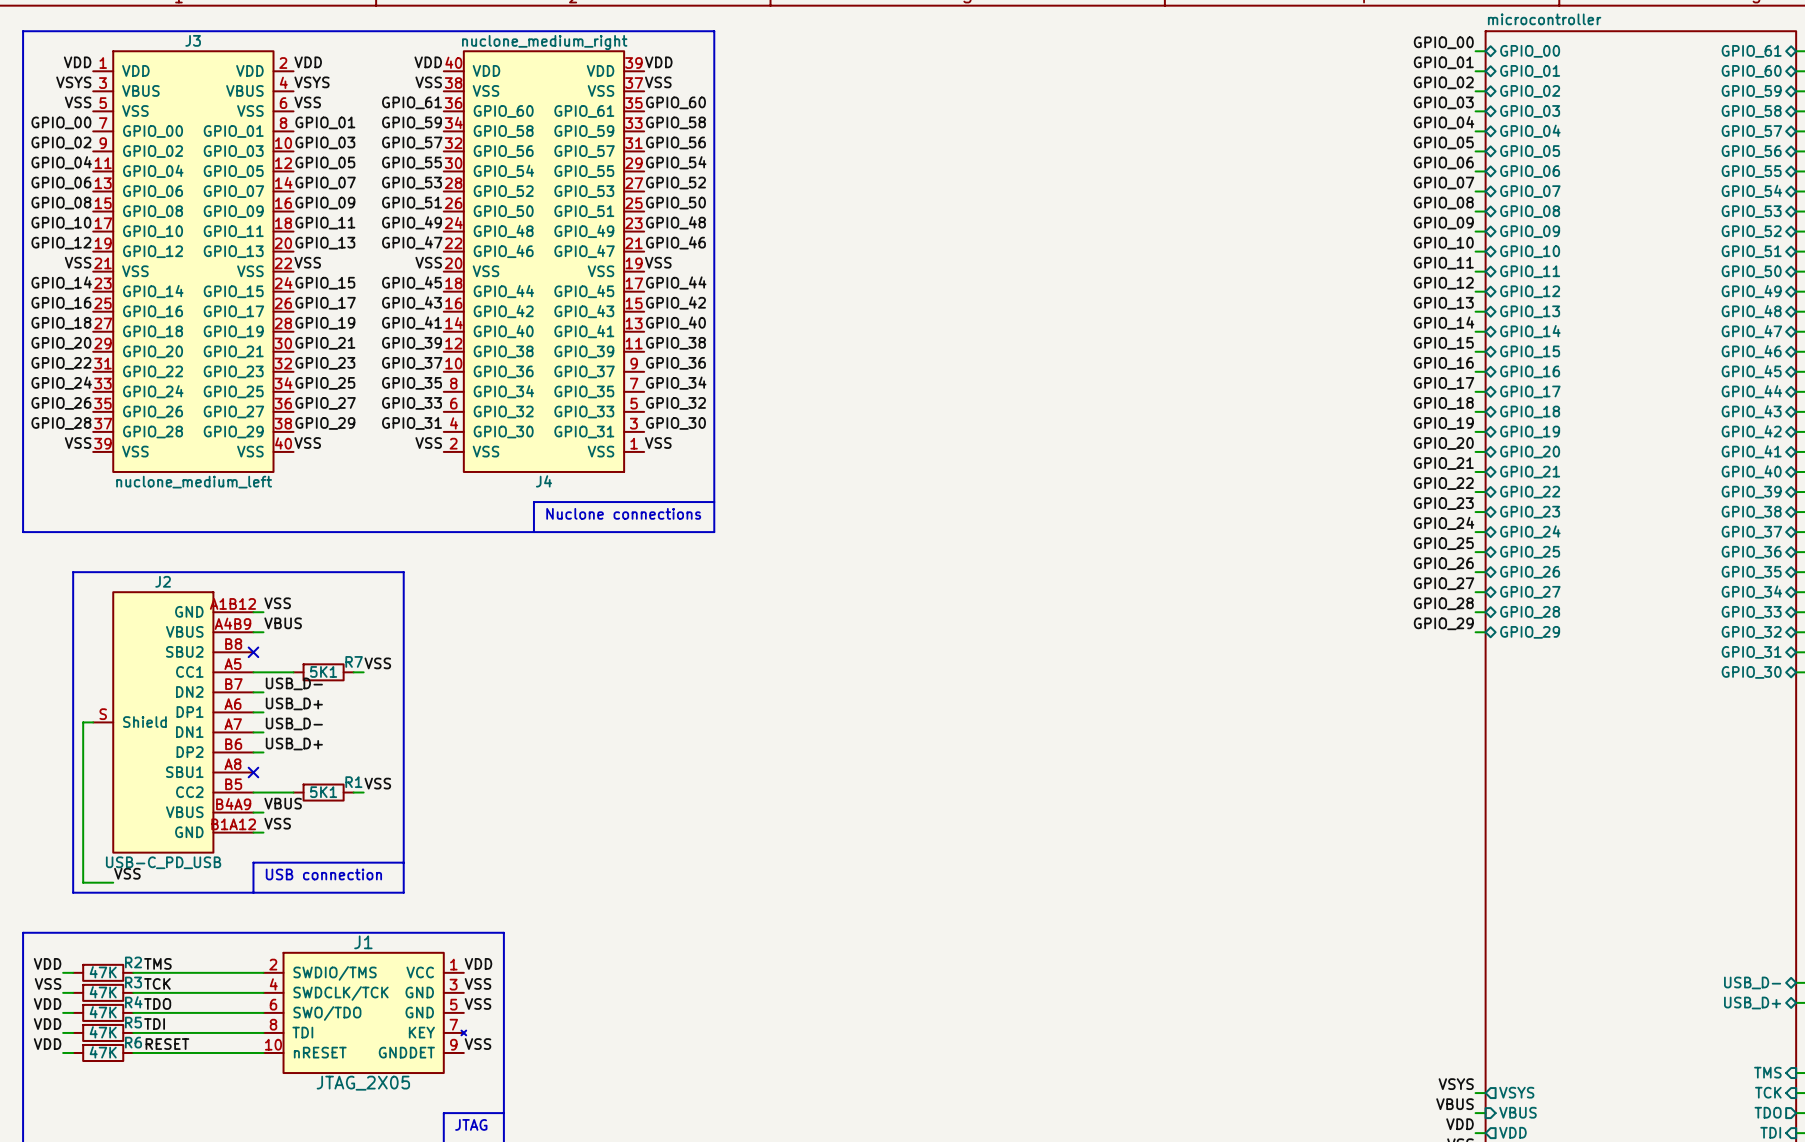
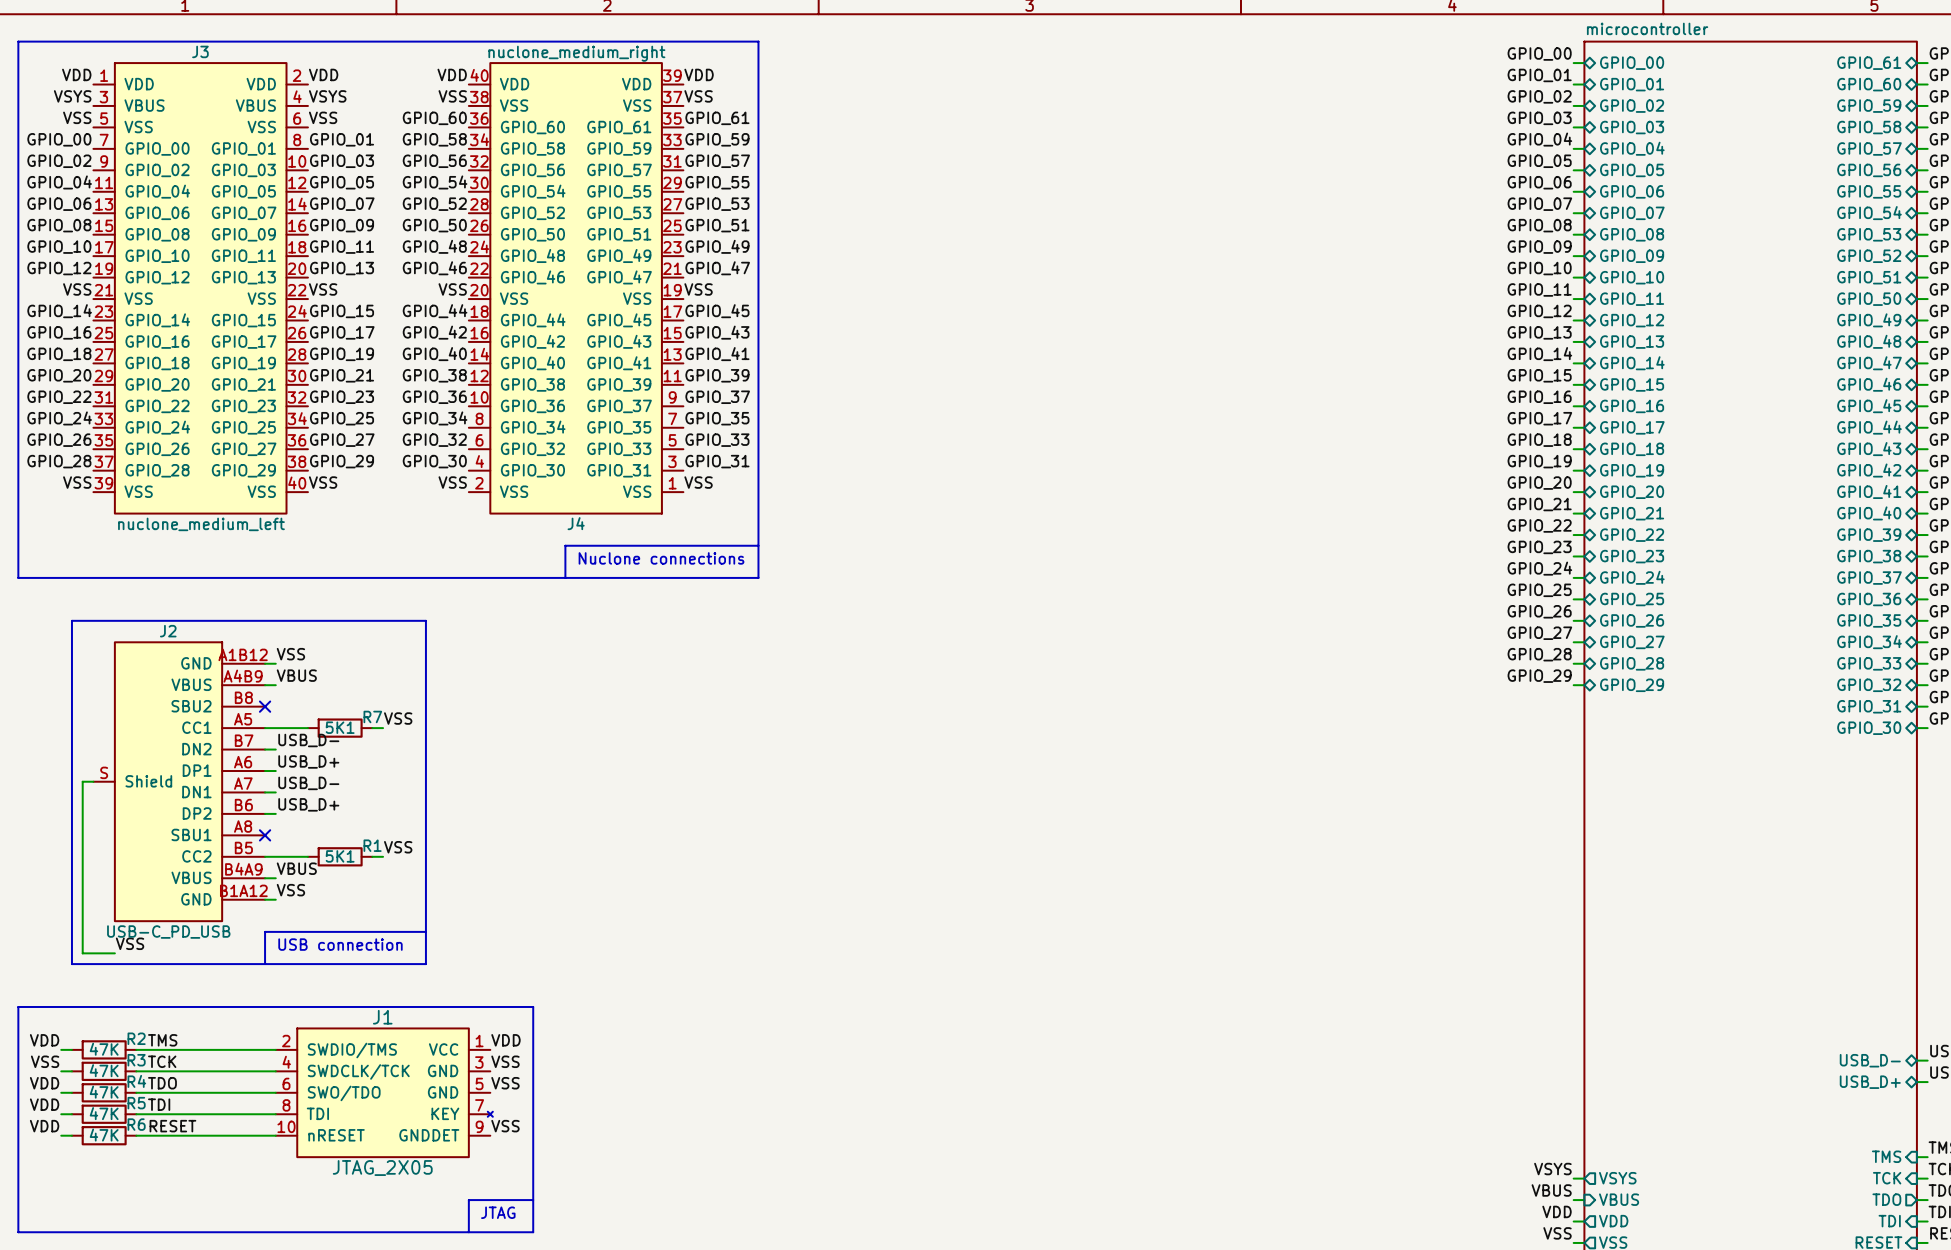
label: GPIO_61 (412, 102) -> GPIO_60 (434, 118)
label: GPIO_60 (675, 102) -> GPIO_61 (717, 118)
label: GPIO_59 (412, 122) -> GPIO_58 (434, 139)
label: GPIO_58 (675, 122) -> GPIO_59 (717, 139)
label: GPIO_57 (412, 142) -> GPIO_56 (434, 161)
label: GPIO_56 (675, 142) -> GPIO_57 (717, 161)
label: GPIO_54 (676, 162) -> GPIO_55 (717, 182)
label: GPIO_55 (412, 163) -> GPIO_54 (435, 182)
label: GPIO_53 (412, 183) -> GPIO_52 (434, 204)
label: GPIO_52 (675, 183) -> GPIO_53 (717, 204)
label: GPIO_51 (412, 203) -> GPIO_50 (434, 225)
label: GPIO_50 (675, 203) -> GPIO_51 (717, 225)
label: GPIO_49 (412, 222) -> GPIO_48 (434, 246)
label: GPIO_48 (675, 222) -> GPIO_49 (717, 246)
label: GPIO_47 (412, 242) -> GPIO_46 (434, 268)
label: GPIO_46 (675, 242) -> GPIO_47 (717, 268)
label: GPIO_45 (412, 282) -> GPIO_44 (435, 311)
label: GPIO_44 (676, 282) -> GPIO_45 (717, 311)
label: GPIO_43 (412, 303) -> GPIO_42 (434, 332)
label: GPIO_42 (675, 303) -> GPIO_43 (717, 332)
label: GPIO_41 (412, 323) -> GPIO_40 (434, 354)
label: GPIO_40 (675, 323) -> GPIO_41 (717, 354)
label: GPIO_39 (412, 343) -> GPIO_38 (434, 375)
label: GPIO_38 (675, 343) -> GPIO_39 (717, 375)
label: GPIO_37 (412, 363) -> GPIO_36 (434, 397)
label: GPIO_36 (675, 363) -> GPIO_37 (717, 397)
label: GPIO_35 (412, 383) -> GPIO_34 (435, 418)
label: GPIO_34 (676, 383) -> GPIO_35 (717, 418)
label: GPIO_33 (412, 403) -> GPIO_32 (434, 440)
label: GPIO_32 (675, 403) -> GPIO_33 (717, 440)
label: GPIO_31 (412, 423) -> GPIO_30 (434, 461)
label: GPIO_30 (675, 423) -> GPIO_31 (717, 461)

